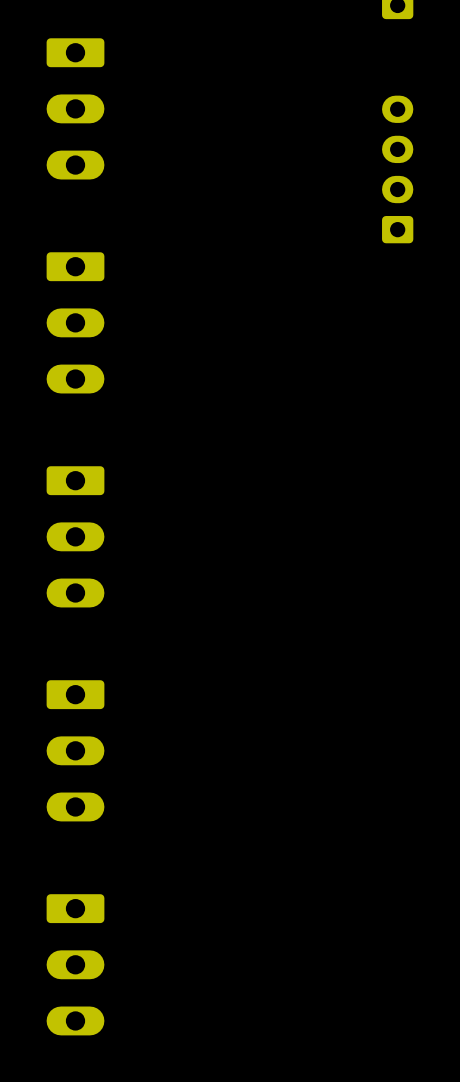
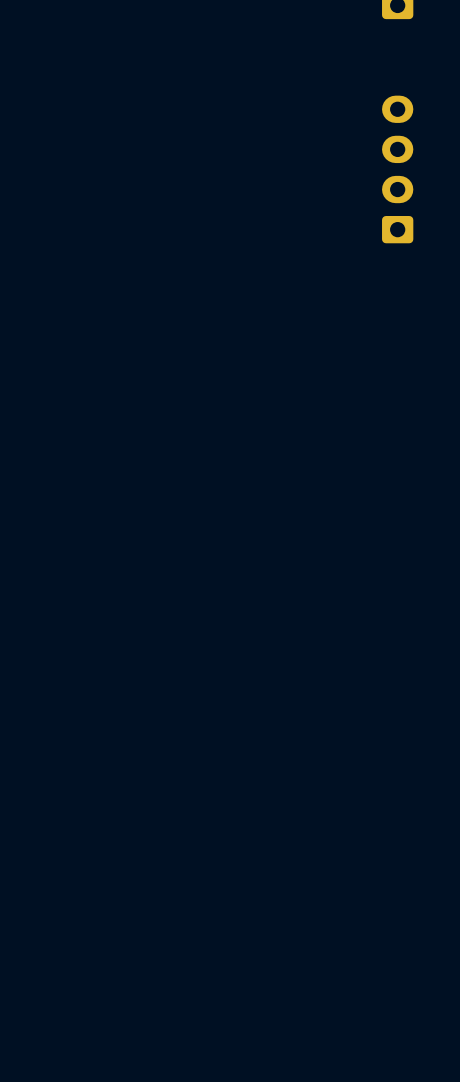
part: (75, 108) -> none
part: (75, 322) -> none
part: (75, 536) -> none
part: (75, 750) -> none
part: (75, 964) -> none

